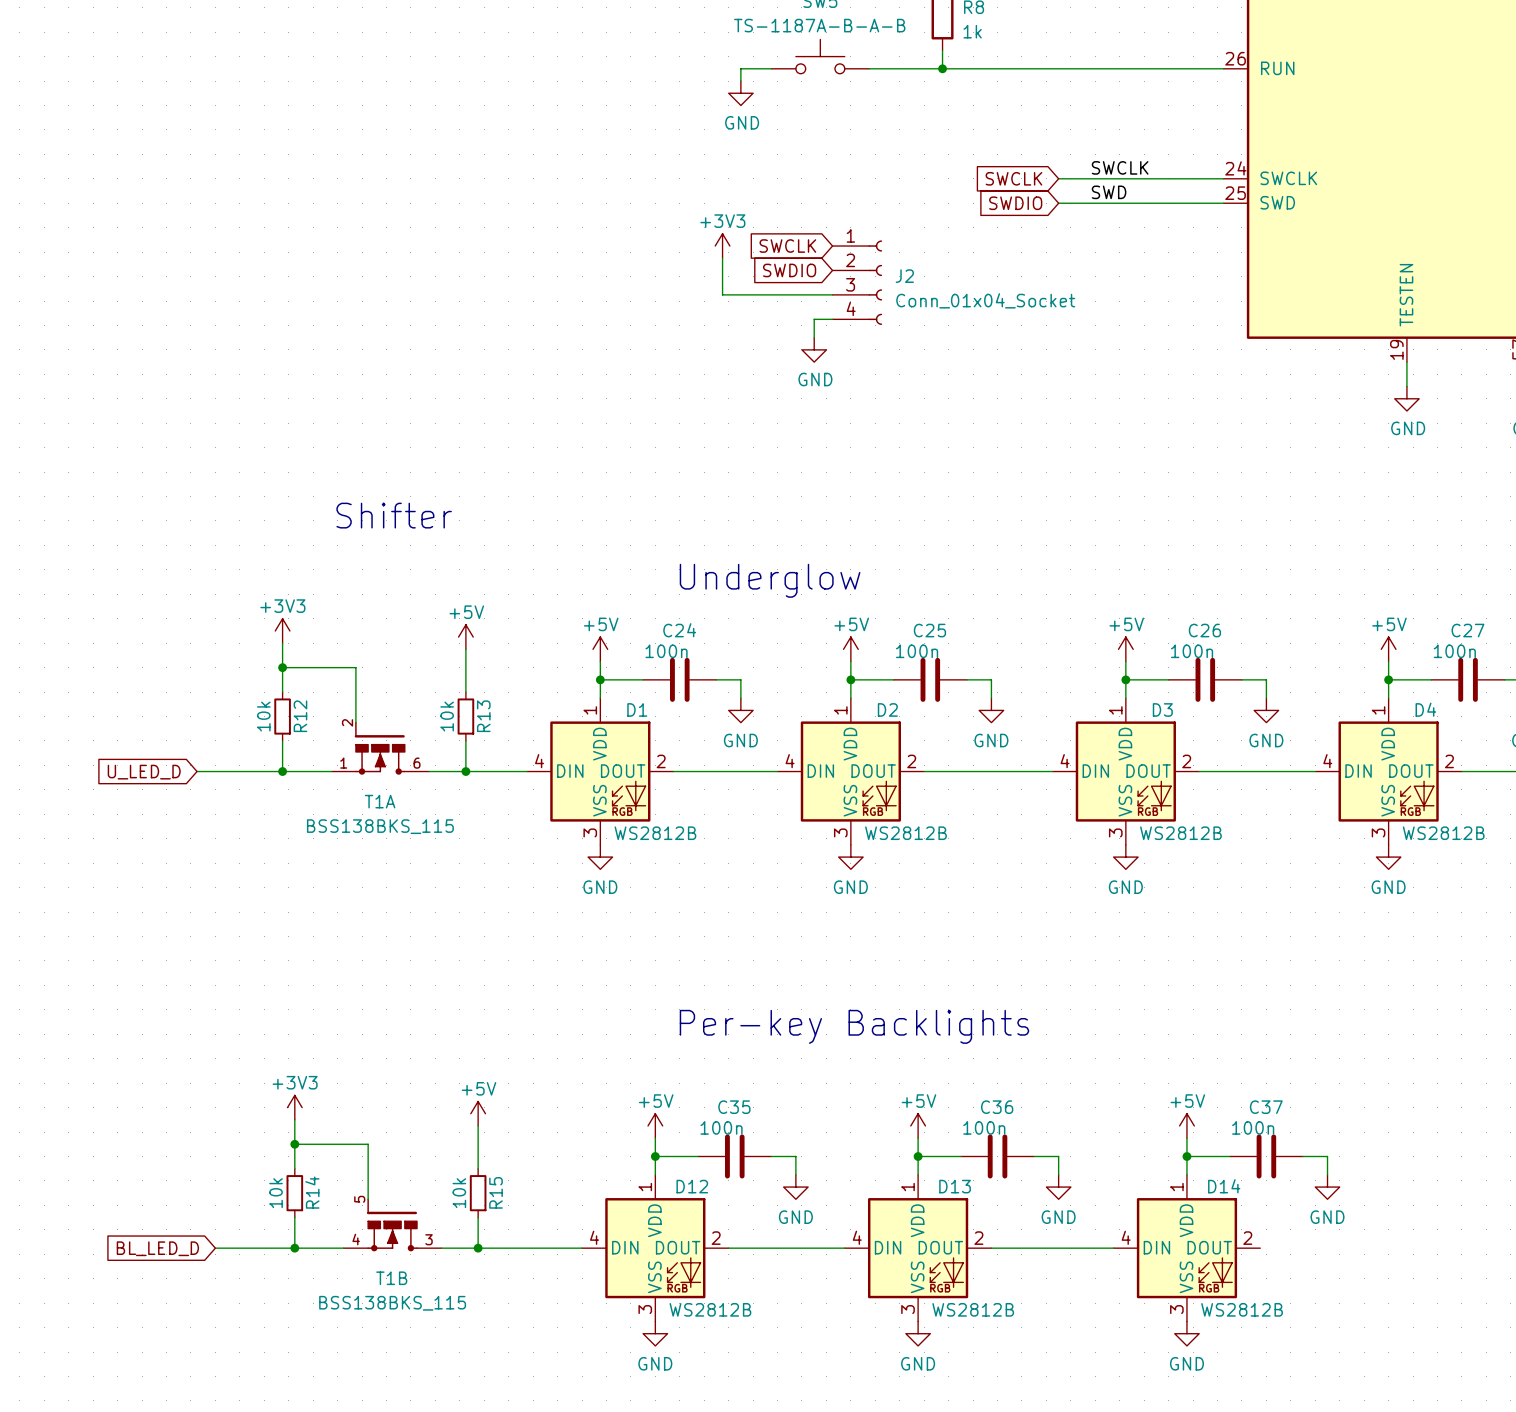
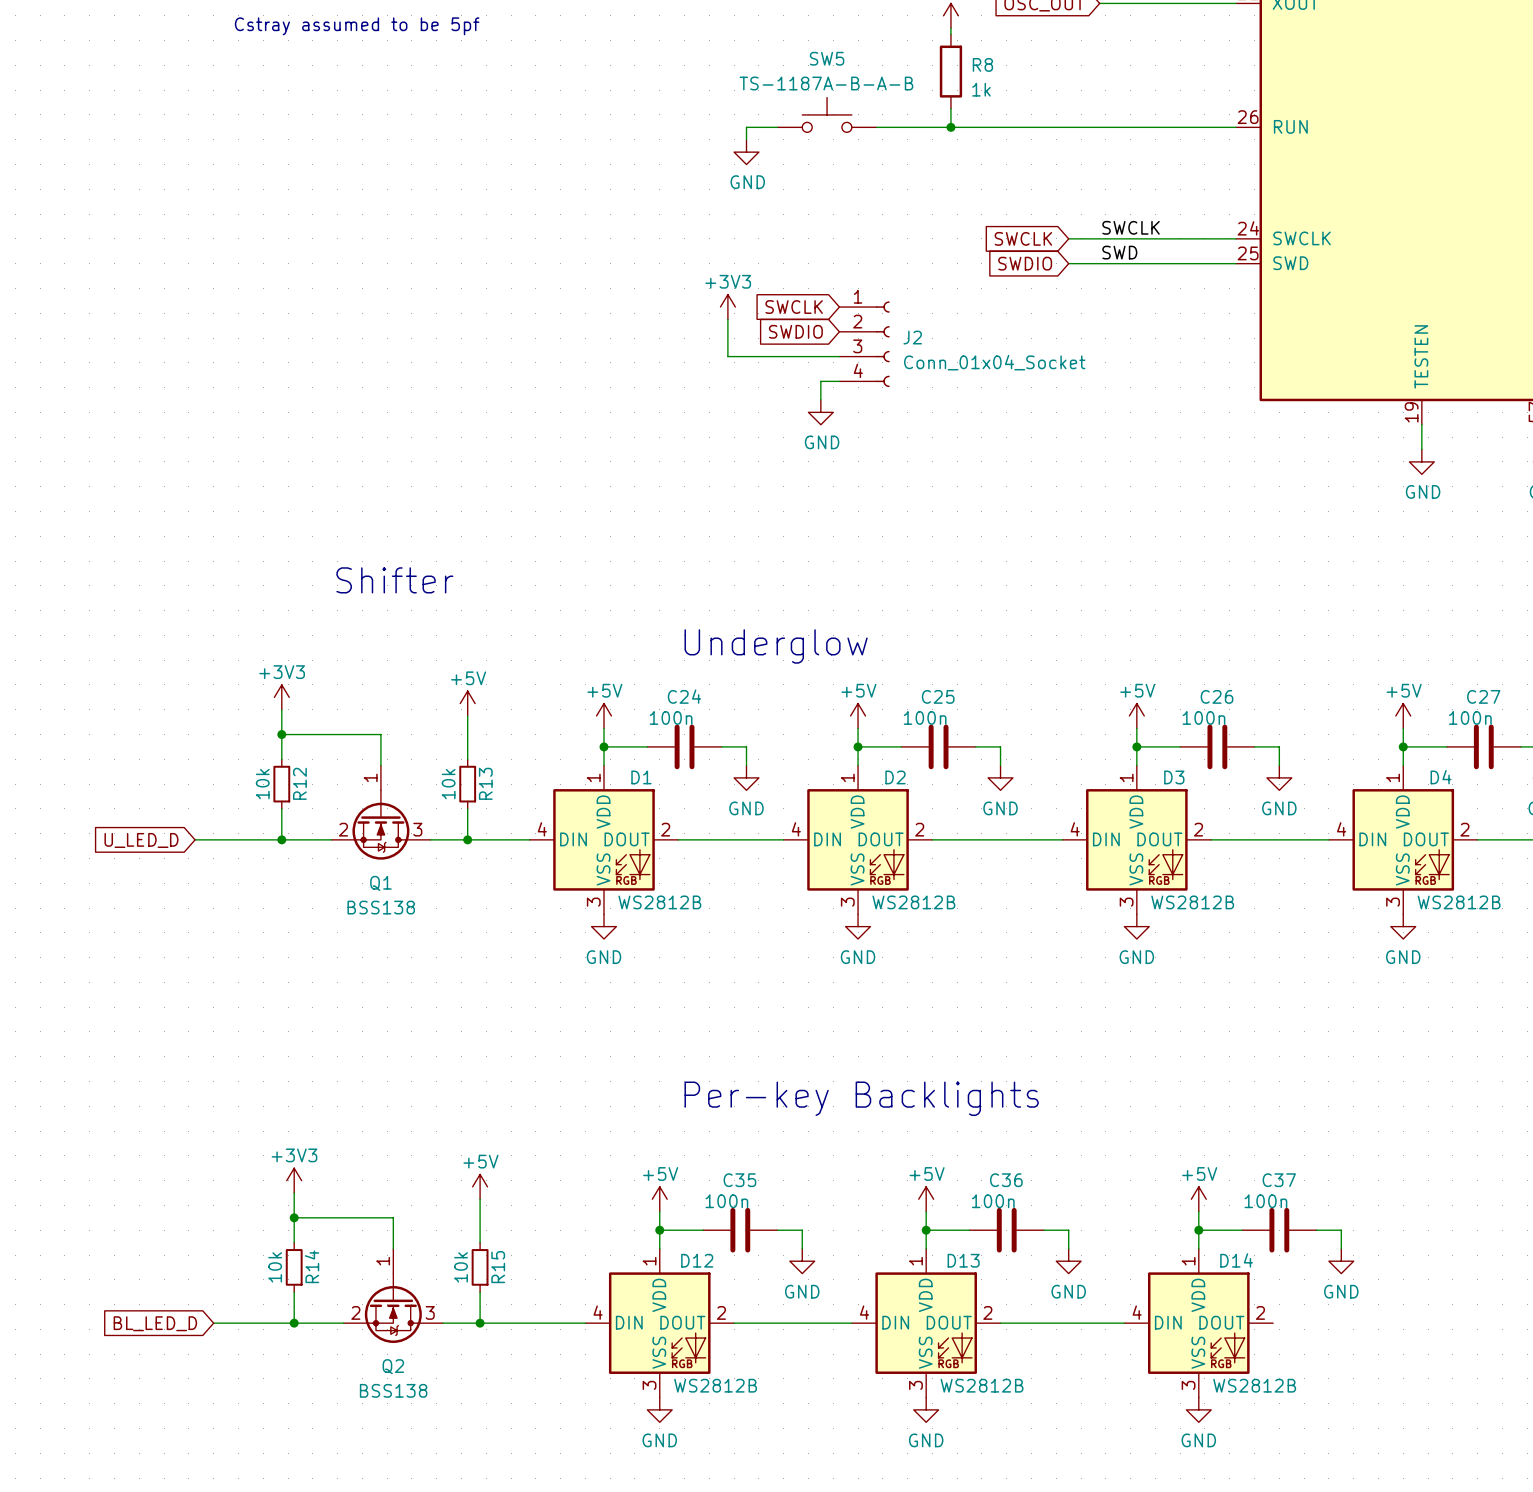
wire: (355, 667) (355, 722) -> (356, 734) (380, 734) (380, 765)
Q1: none -> BSS138 (380, 812)
T1A: BSS138BKS_115 (380, 748) -> none
wire: (368, 1144) (368, 1199) -> (368, 1217) (393, 1217) (393, 1248)
Q2: none -> BSS138 (393, 1295)
T1B: BSS138BKS_115 (392, 1224) -> none

